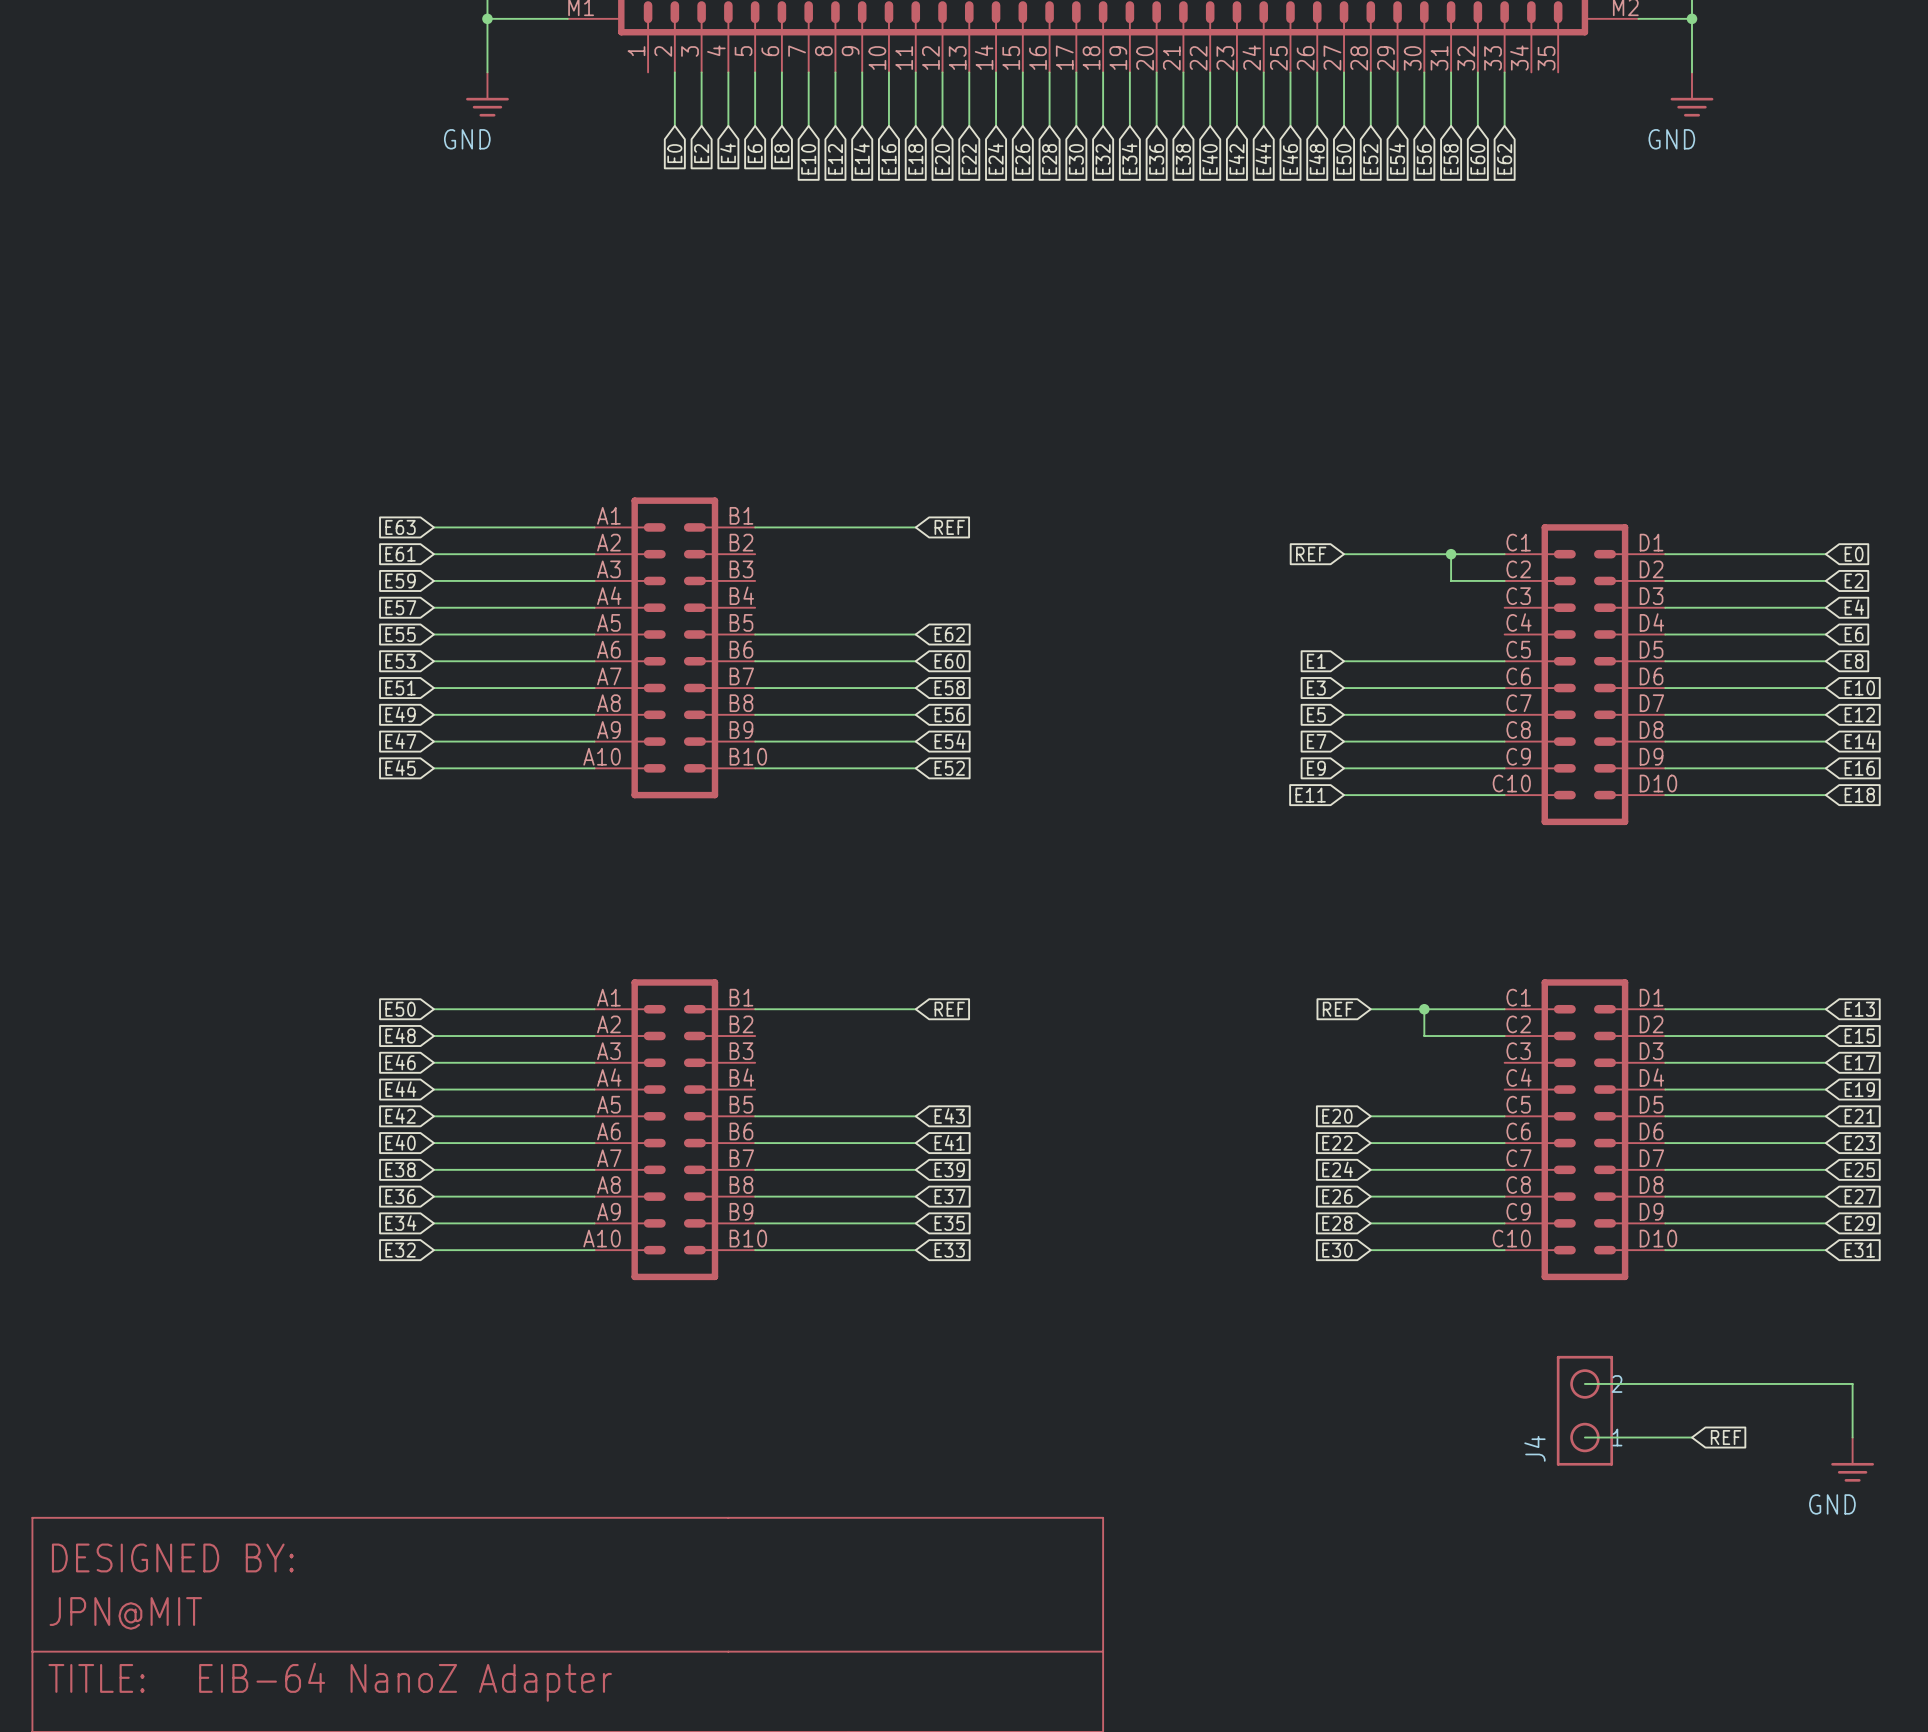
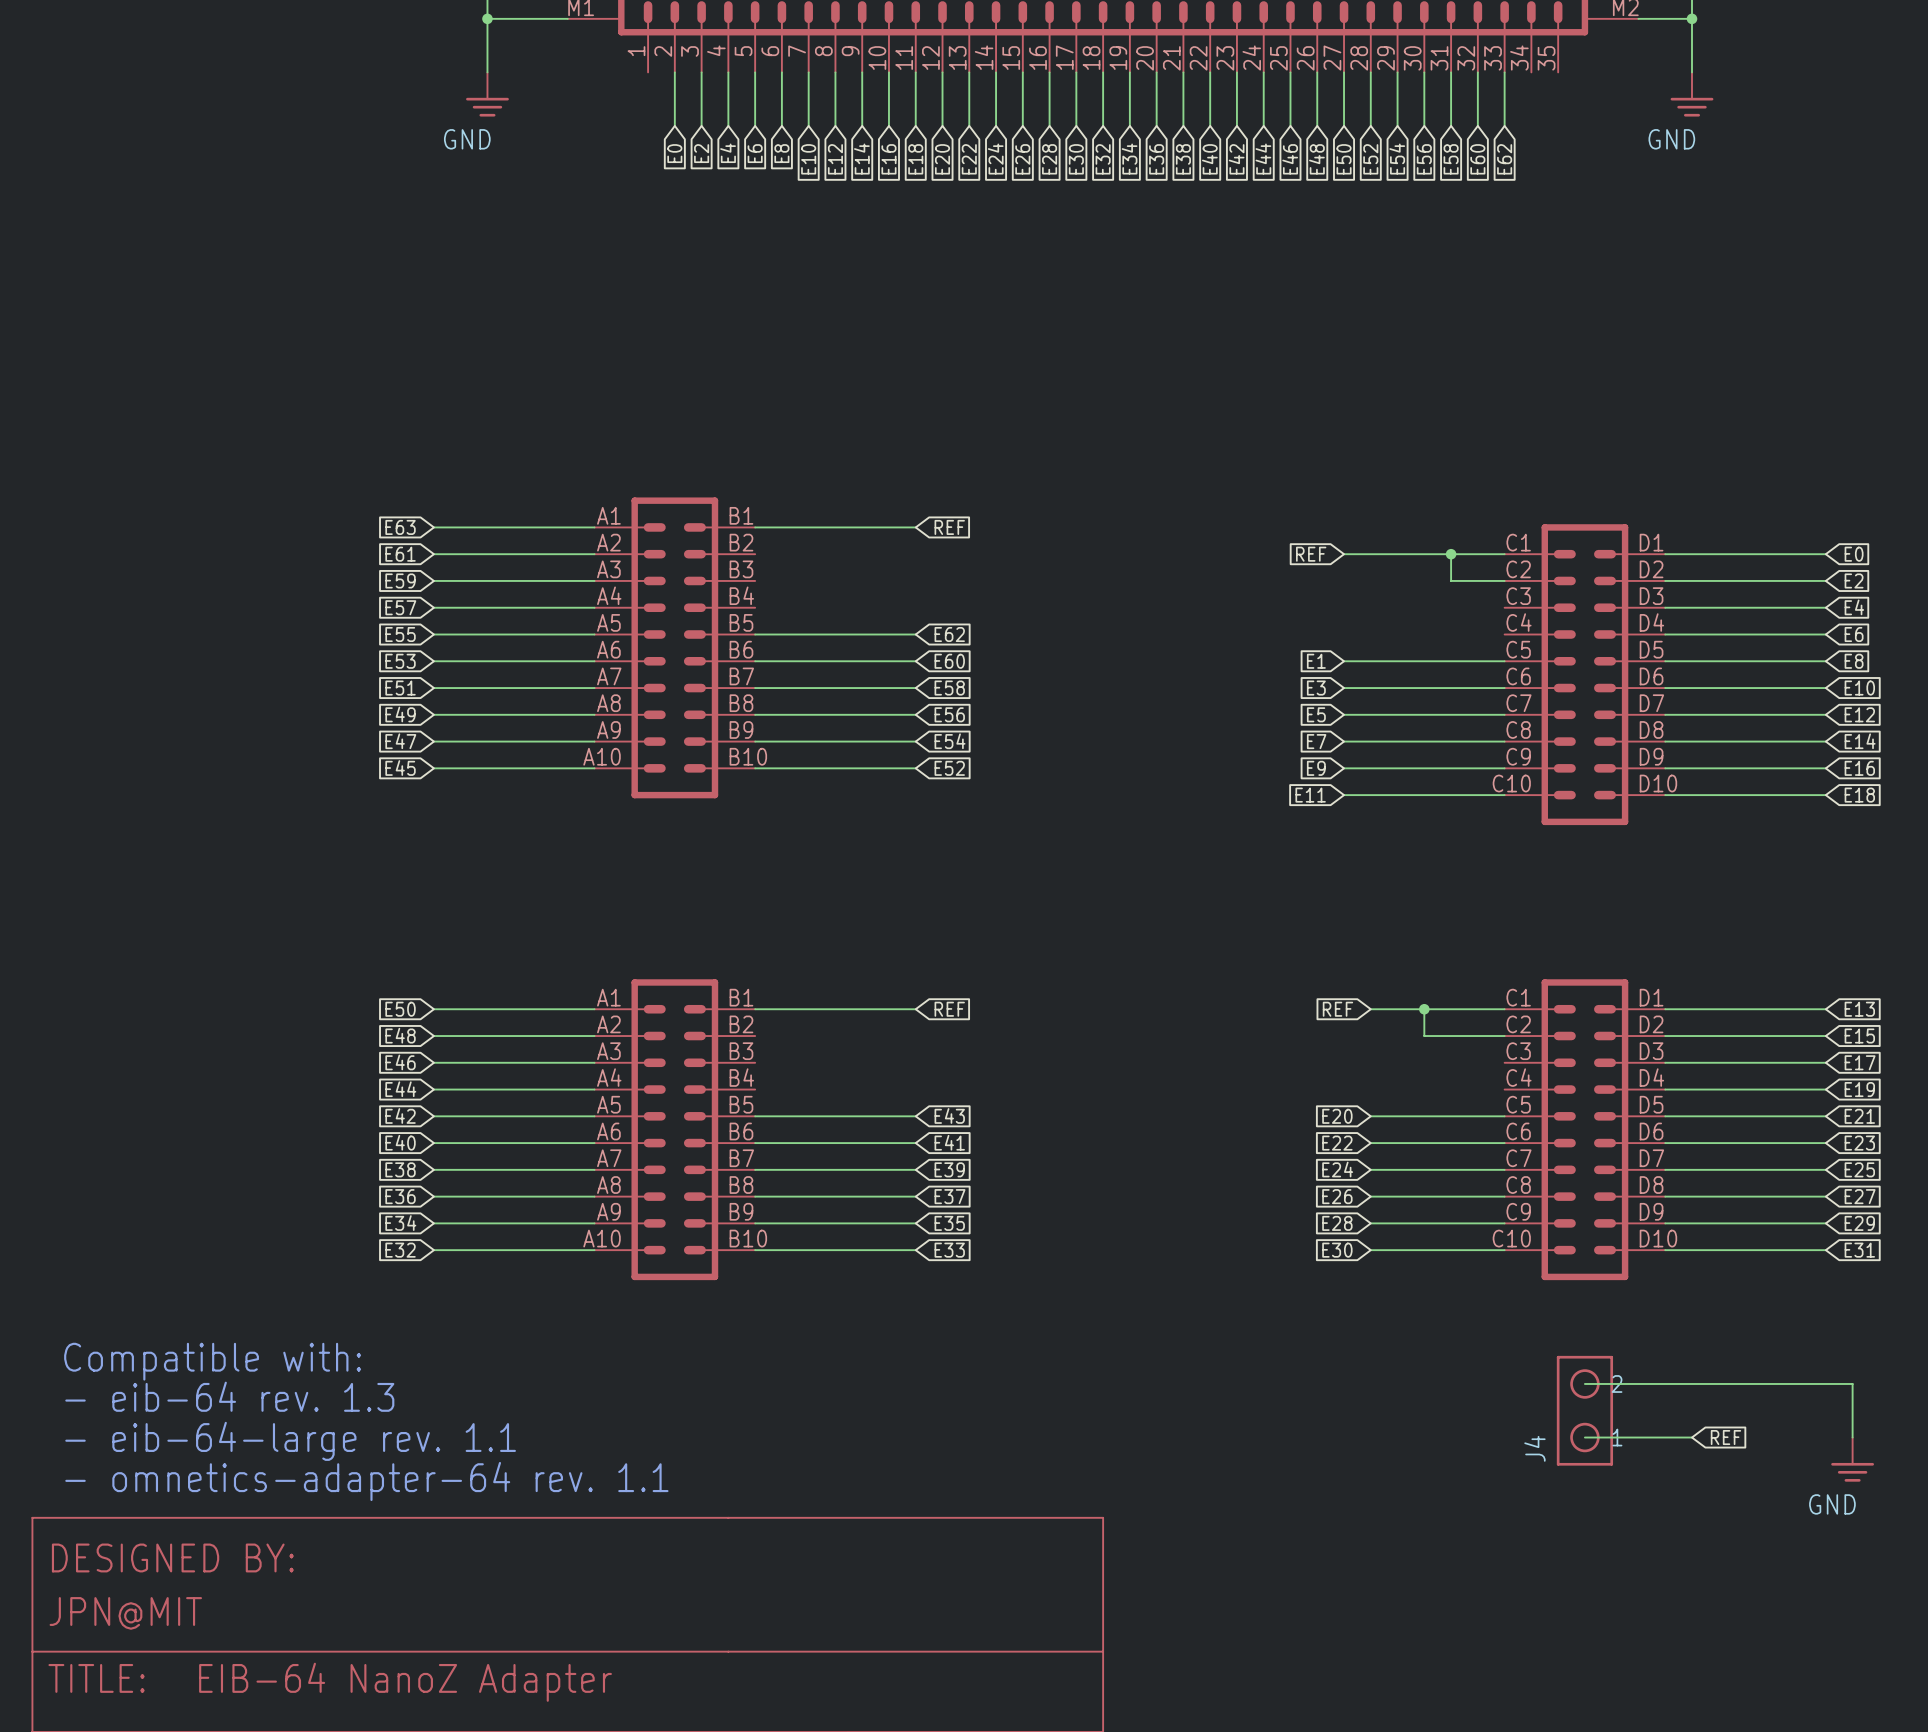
text: none -> Compatible with: (212, 1361)
text: none -> - eib-64 rev. 1.3 (229, 1396)
text: none -> - eib-64-large rev. 1.1 (290, 1441)
text: none -> - omnetics-adapter-64 rev. 1.1 (366, 1481)

